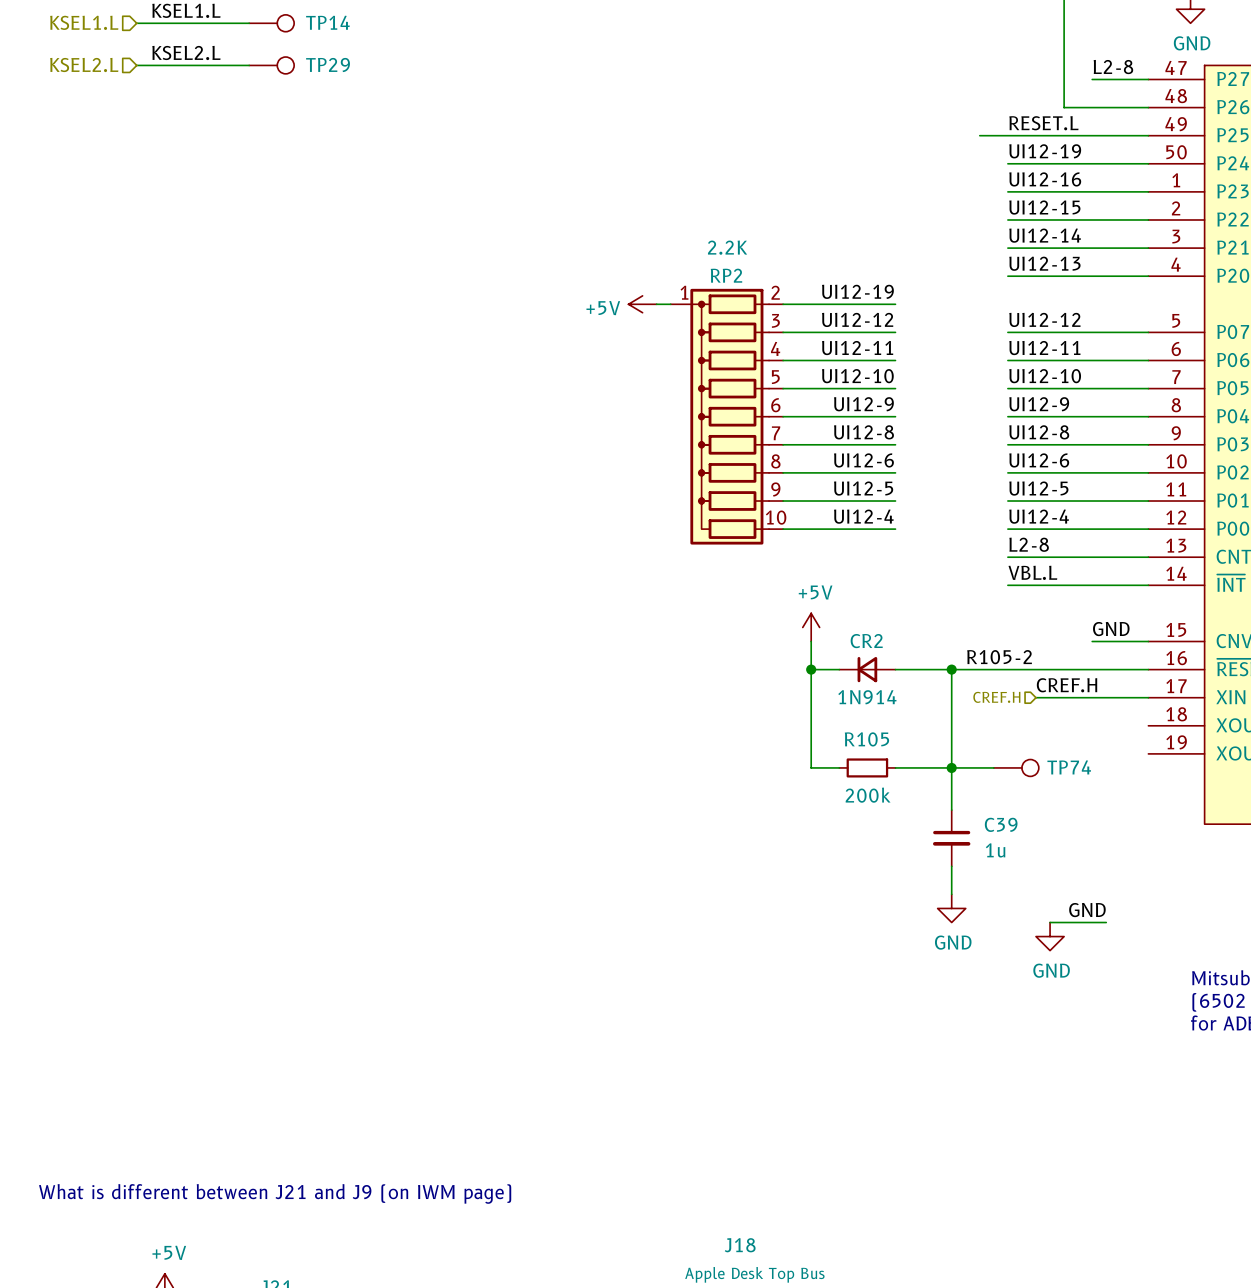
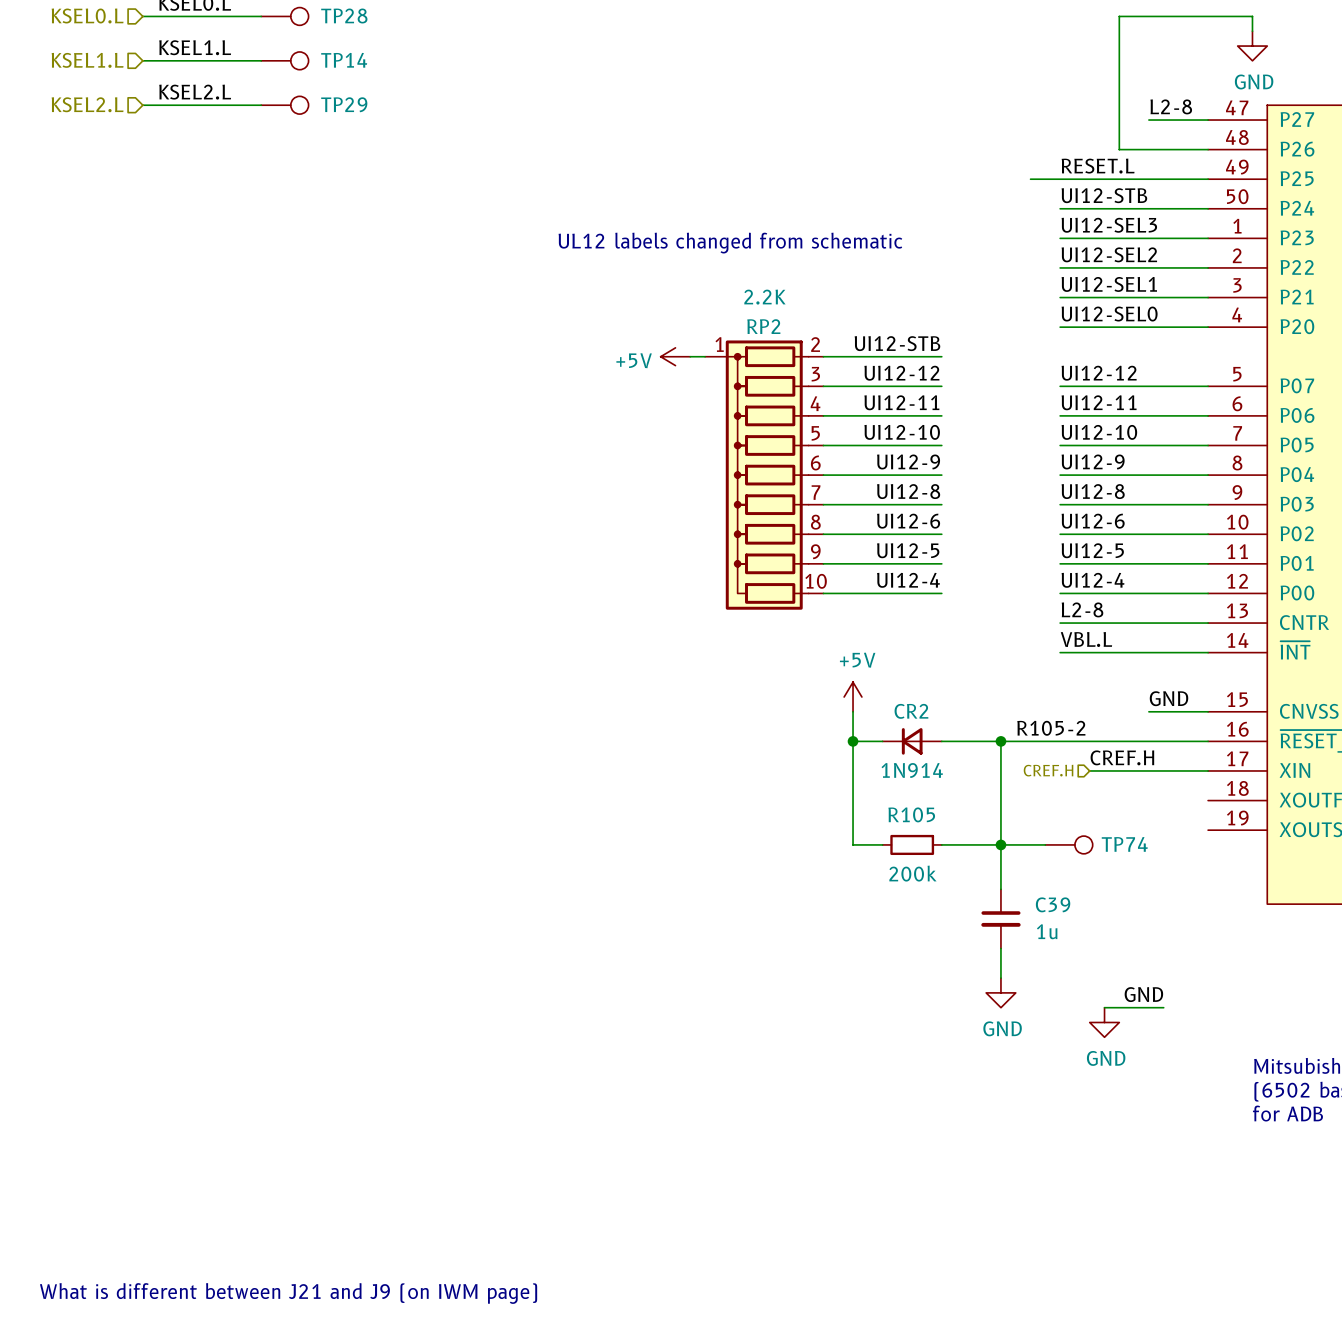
label: UI12-19 (1045, 151) -> UI12-STB (1104, 195)
label: UI12-16 (1045, 179) -> UI12-SEL3 (1109, 225)
text: none -> UL12 labels changed from schematic (730, 243)
label: UI12-15 (1044, 207) -> UI12-SEL2 (1109, 254)
label: UI12-14 (1045, 235) -> UI12-SEL1 (1109, 284)
label: UI12-13 (1044, 263) -> UI12-SEL0 (1109, 314)
label: UI12-19 (857, 291) -> UI12-STB (897, 343)

